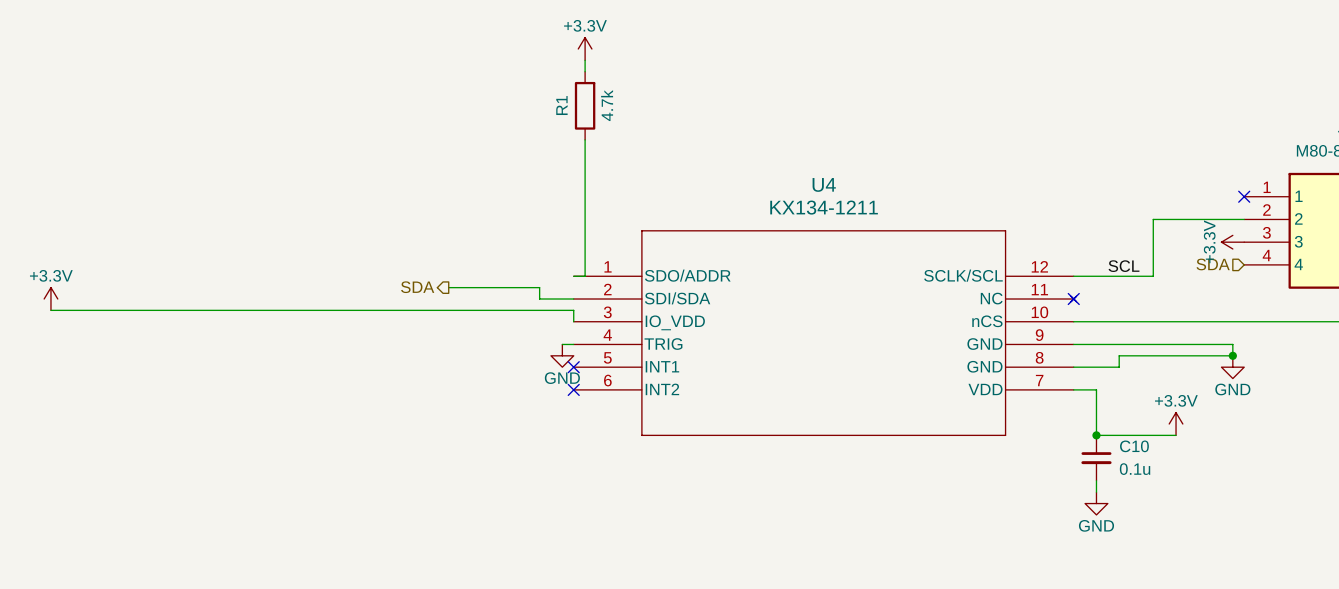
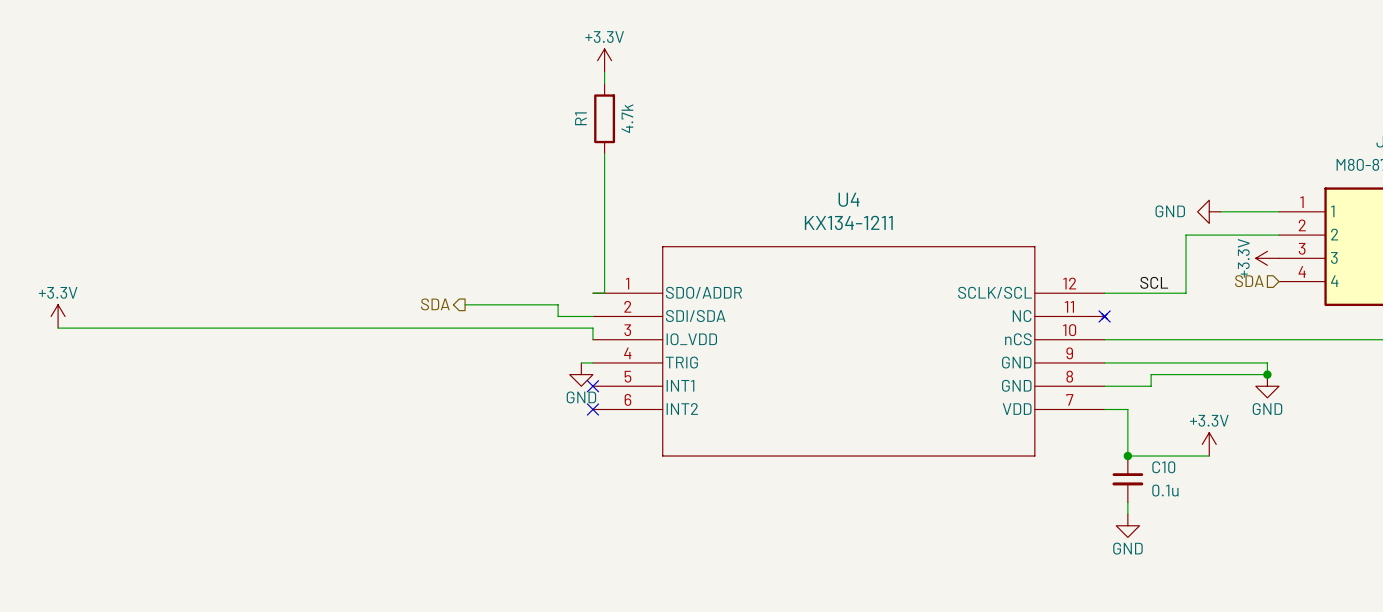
power symbol: none -> GND (1209, 211)
wire: none -> (1220, 211) (1279, 211)
no-connect mark: (1244, 196) -> none

